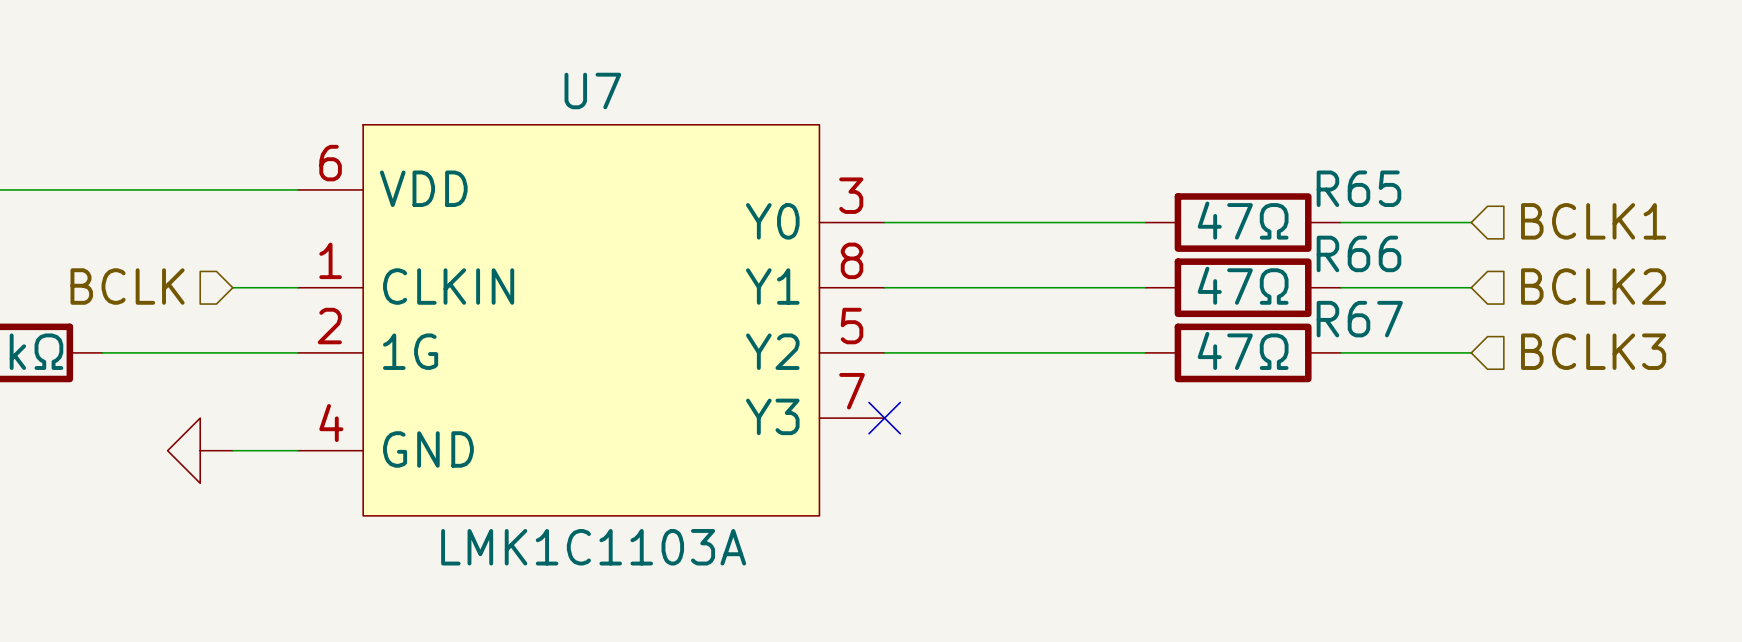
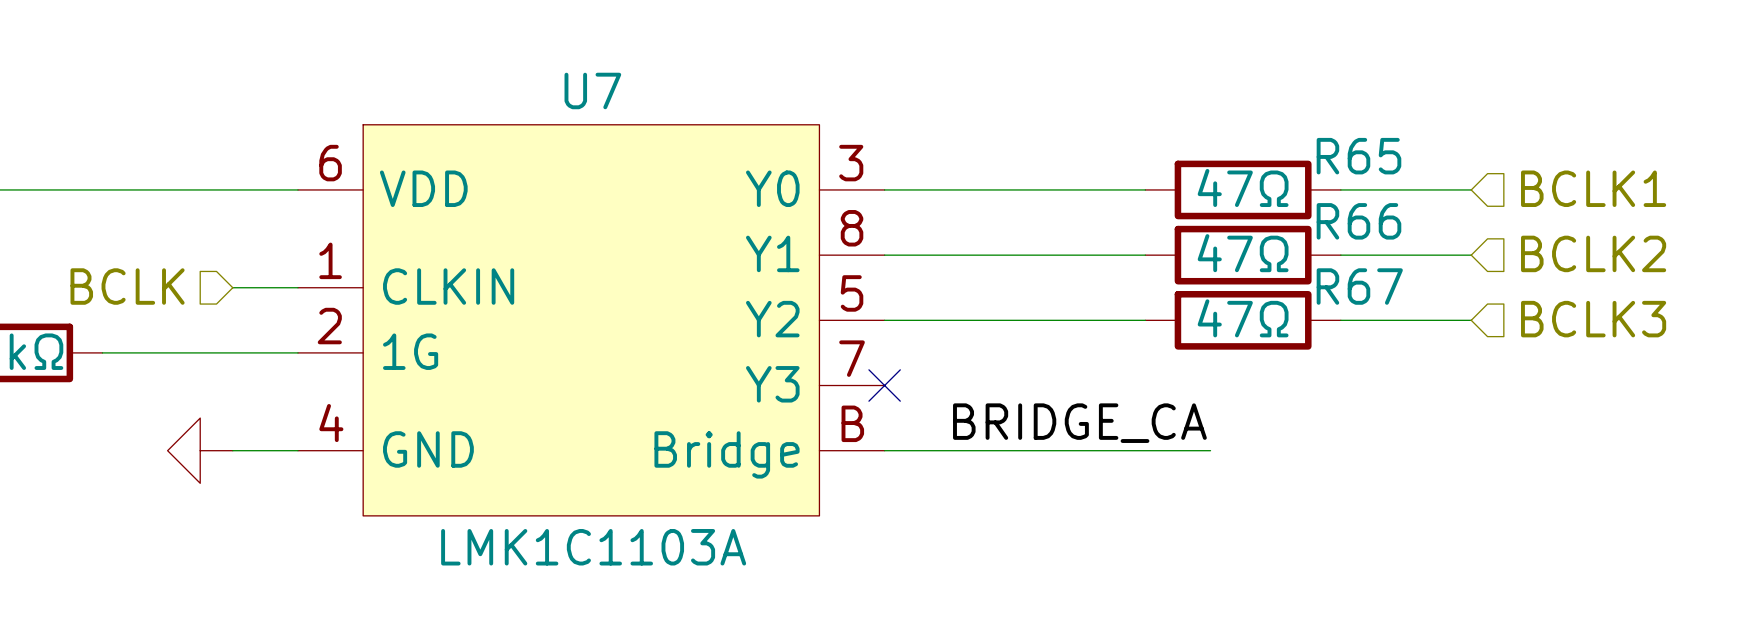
U7 symbol: [297, 124, 885, 516] -> [297, 124, 885, 516]
hierarchical label position: BCLK1 (1593, 221) -> BCLK1 (1593, 188)
wire: (884, 222) (1145, 222) -> (884, 189) (1145, 189)
R65 position: (1243, 222) -> (1243, 189)
wire: (1340, 222) (1471, 222) -> (1340, 189) (1471, 189)
hierarchical label position: BCLK2 (1593, 286) -> BCLK2 (1593, 253)
wire: (884, 287) (1145, 287) -> (884, 255) (1145, 255)
R66 position: (1243, 287) -> (1243, 255)
wire: (1340, 287) (1471, 287) -> (1340, 255) (1471, 255)
hierarchical label position: BCLK3 (1593, 351) -> BCLK3 (1593, 319)
wire: (884, 352) (1145, 352) -> (884, 320) (1145, 320)
R67 position: (1243, 352) -> (1243, 320)
wire: (1340, 352) (1471, 352) -> (1340, 320) (1471, 320)
no-connect mark position: (884, 418) -> (884, 385)
label: none -> BRIDGE_CA (1079, 423)
wire: none -> (884, 450) (1210, 450)

